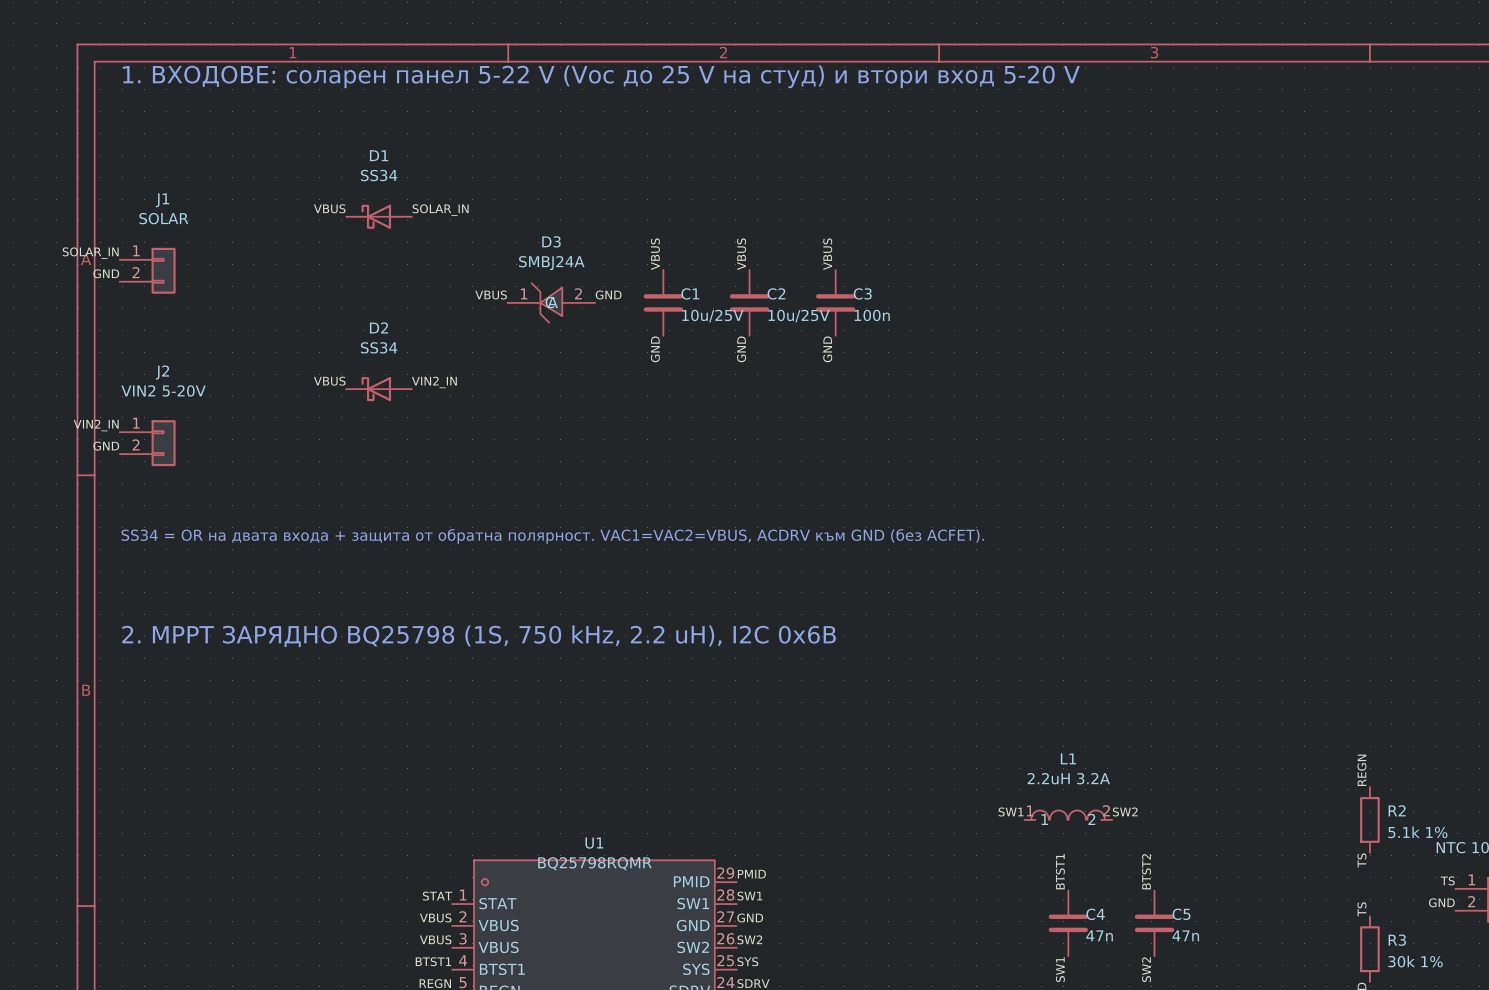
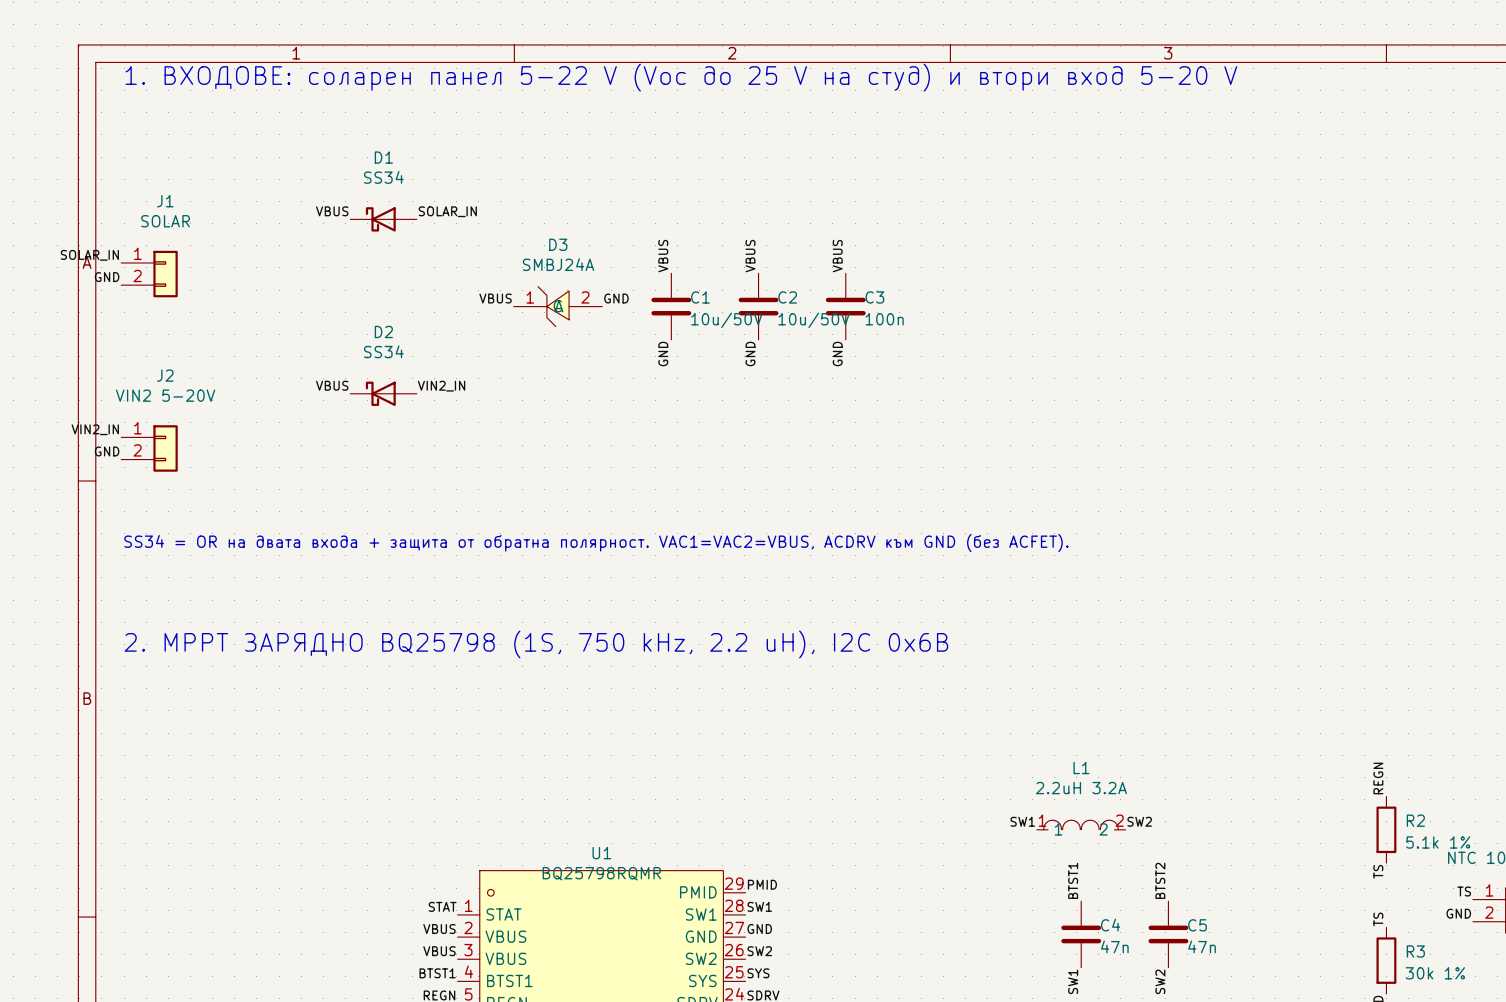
C1 value: 10u/25V (712, 316) -> 10u/50V (726, 320)
C2 value: 10u/25V (799, 316) -> 10u/50V (814, 320)

